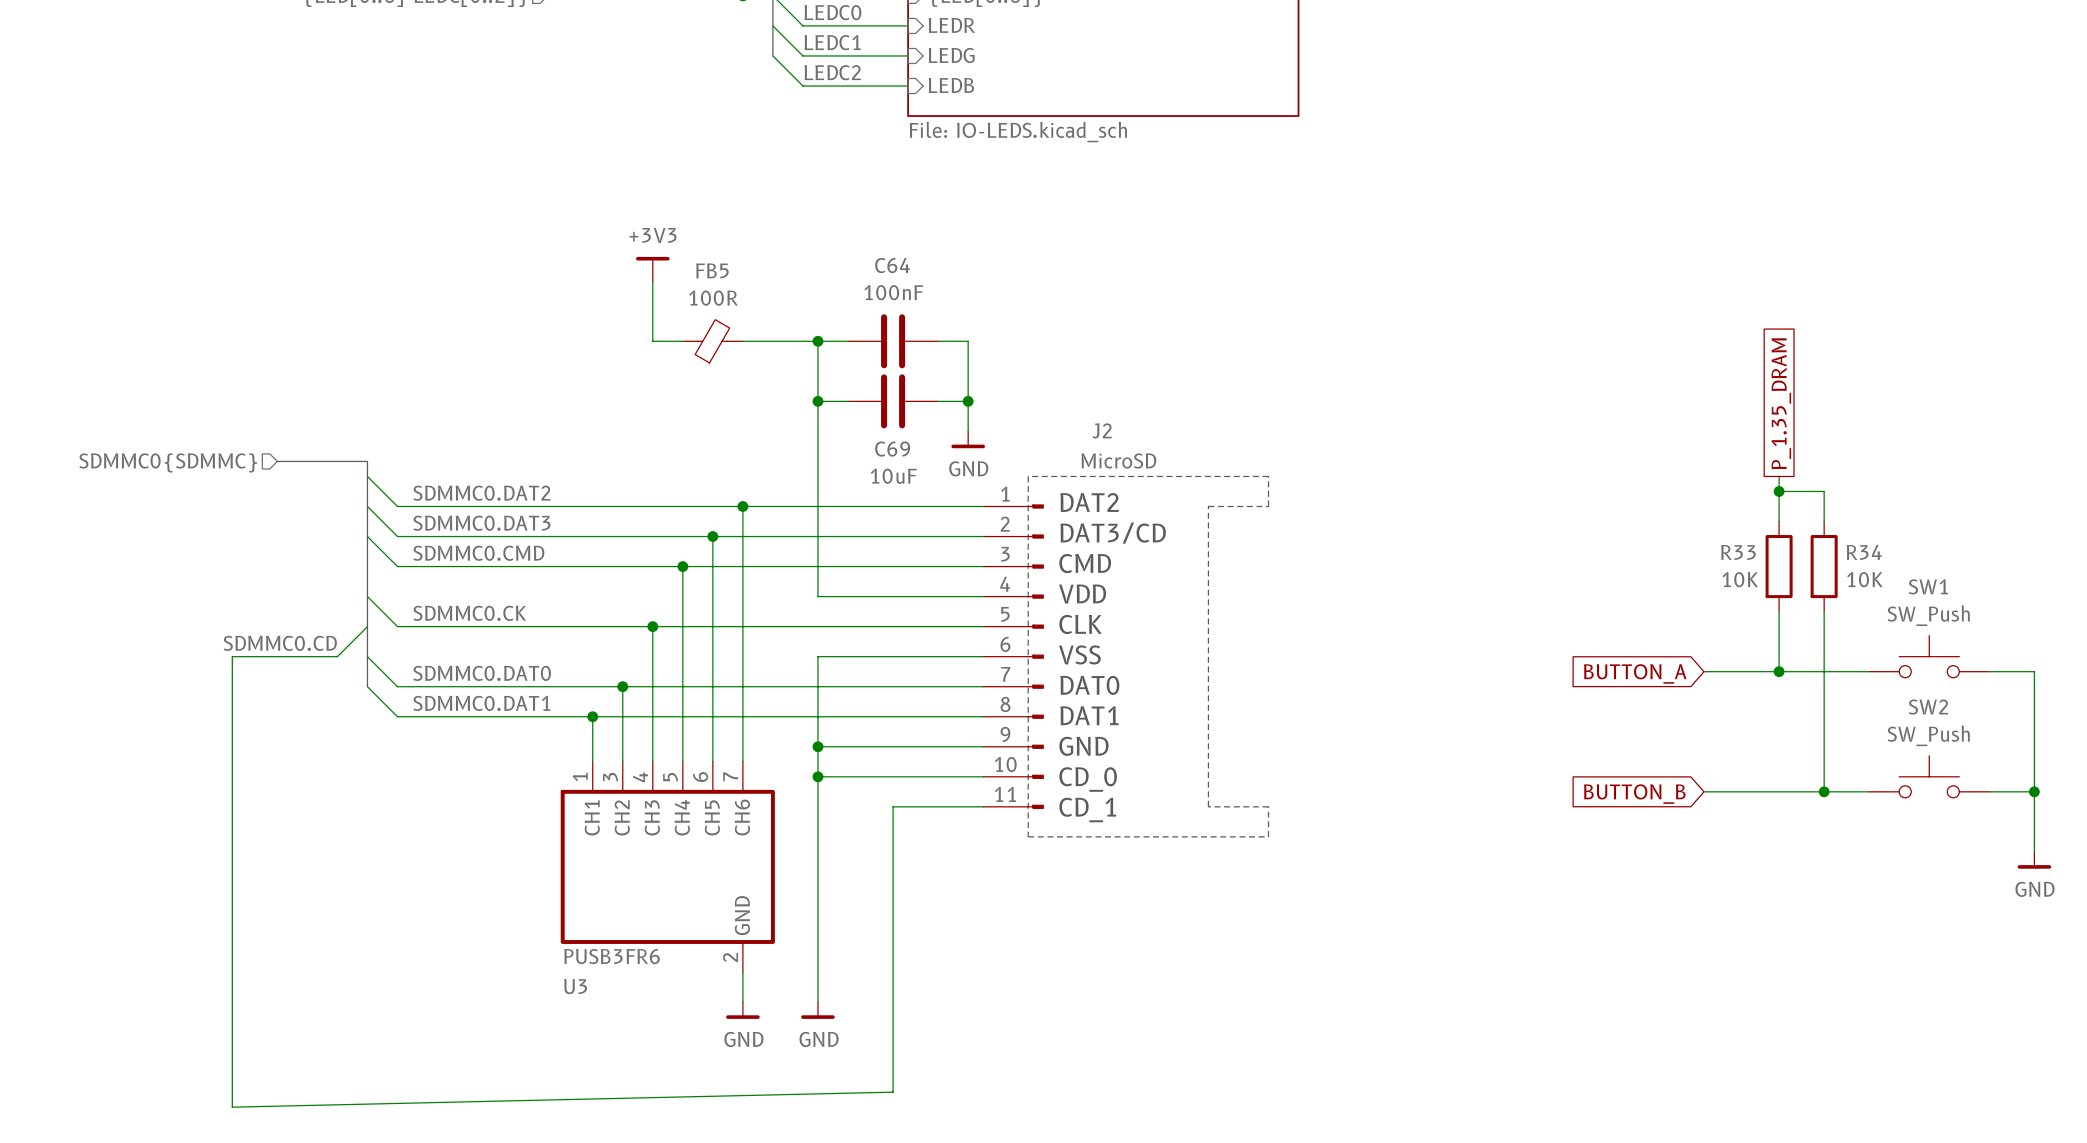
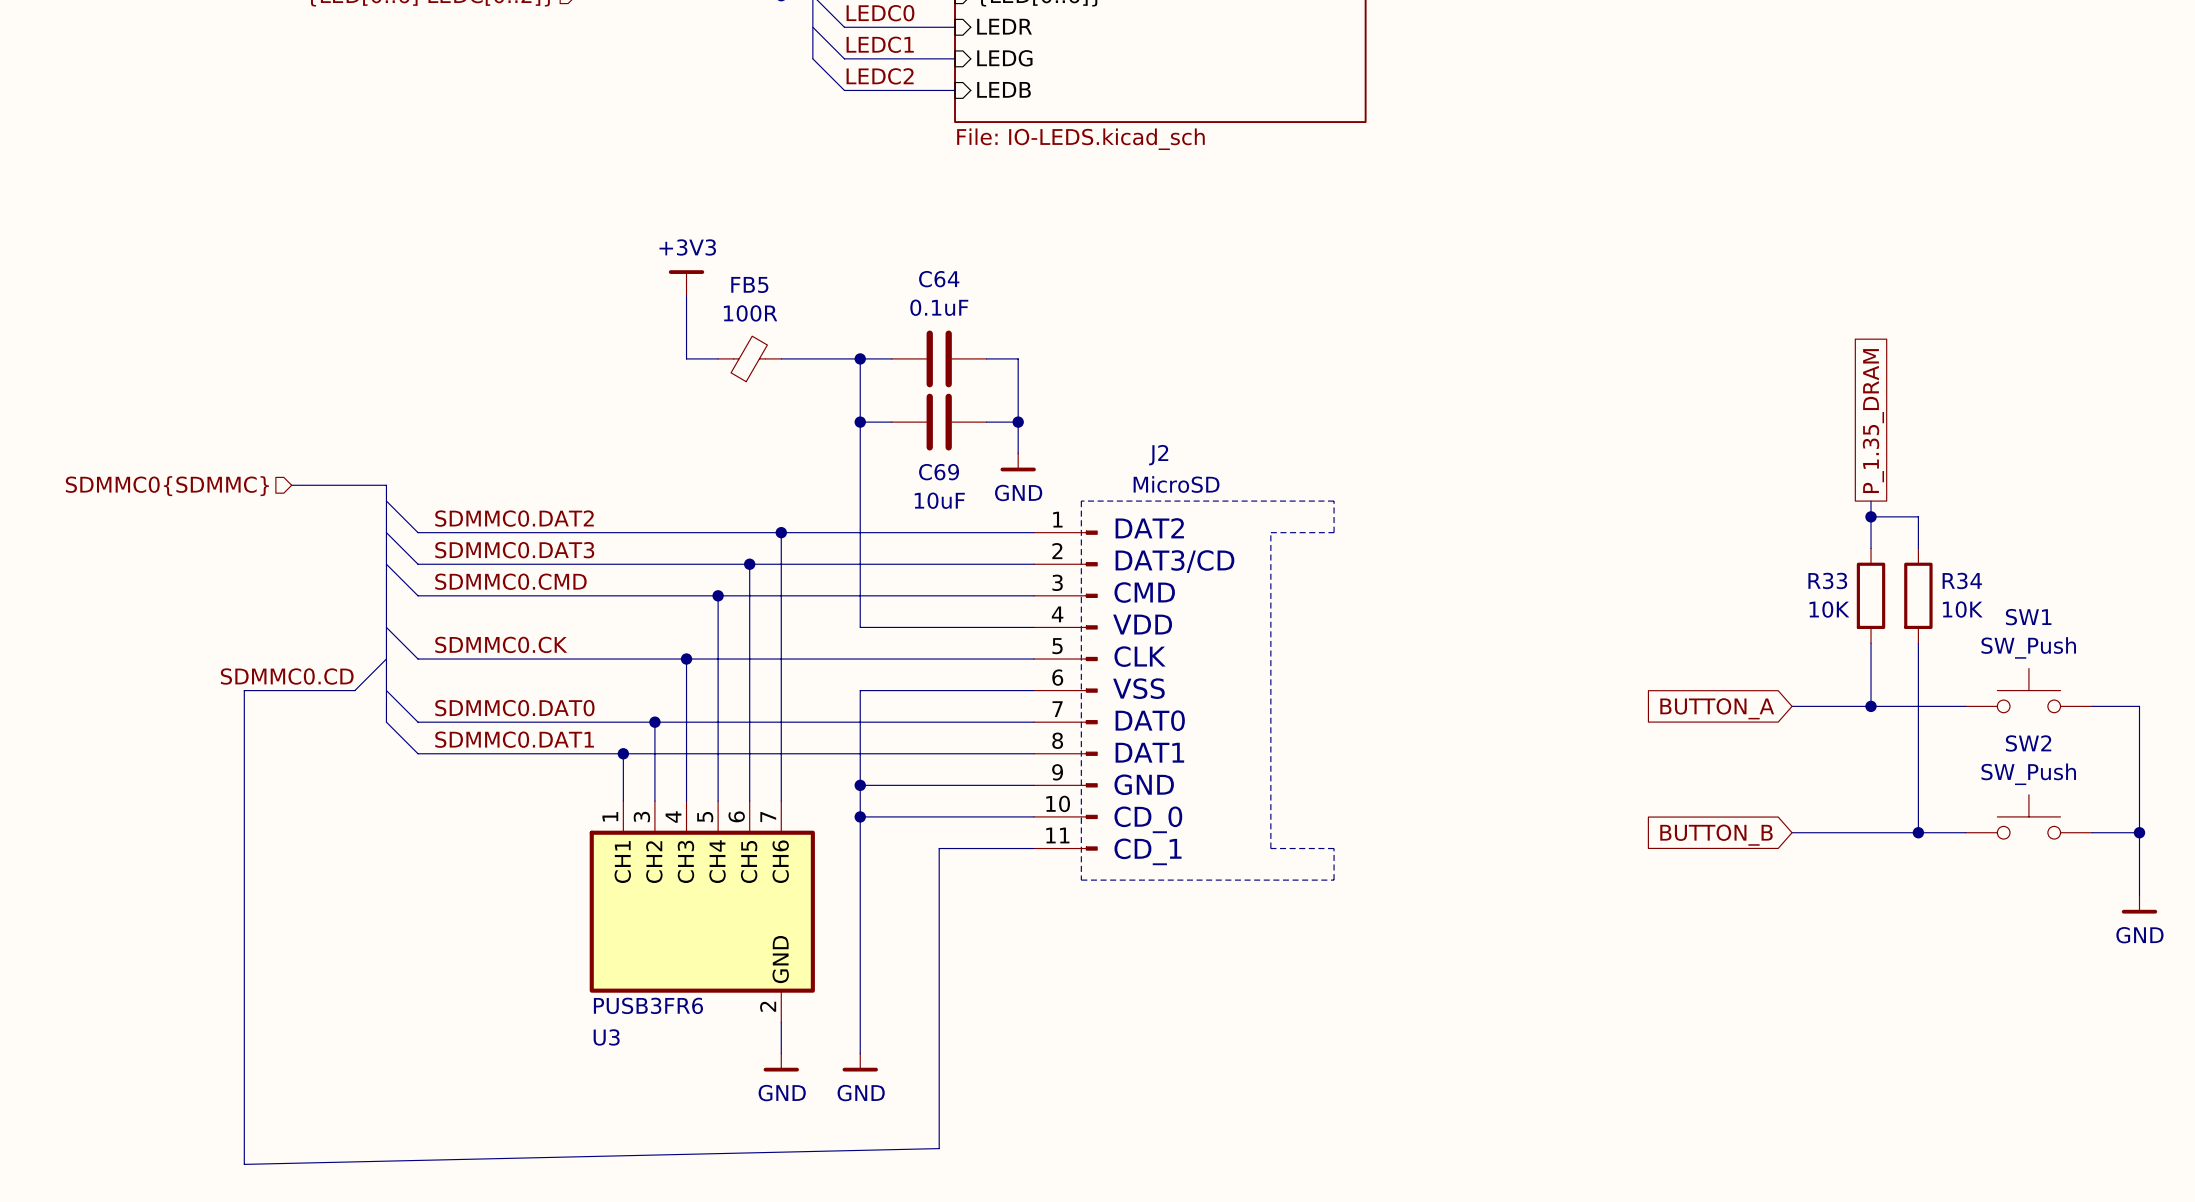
C64 value: 100nF (893, 292) -> 0.1uF (939, 307)

